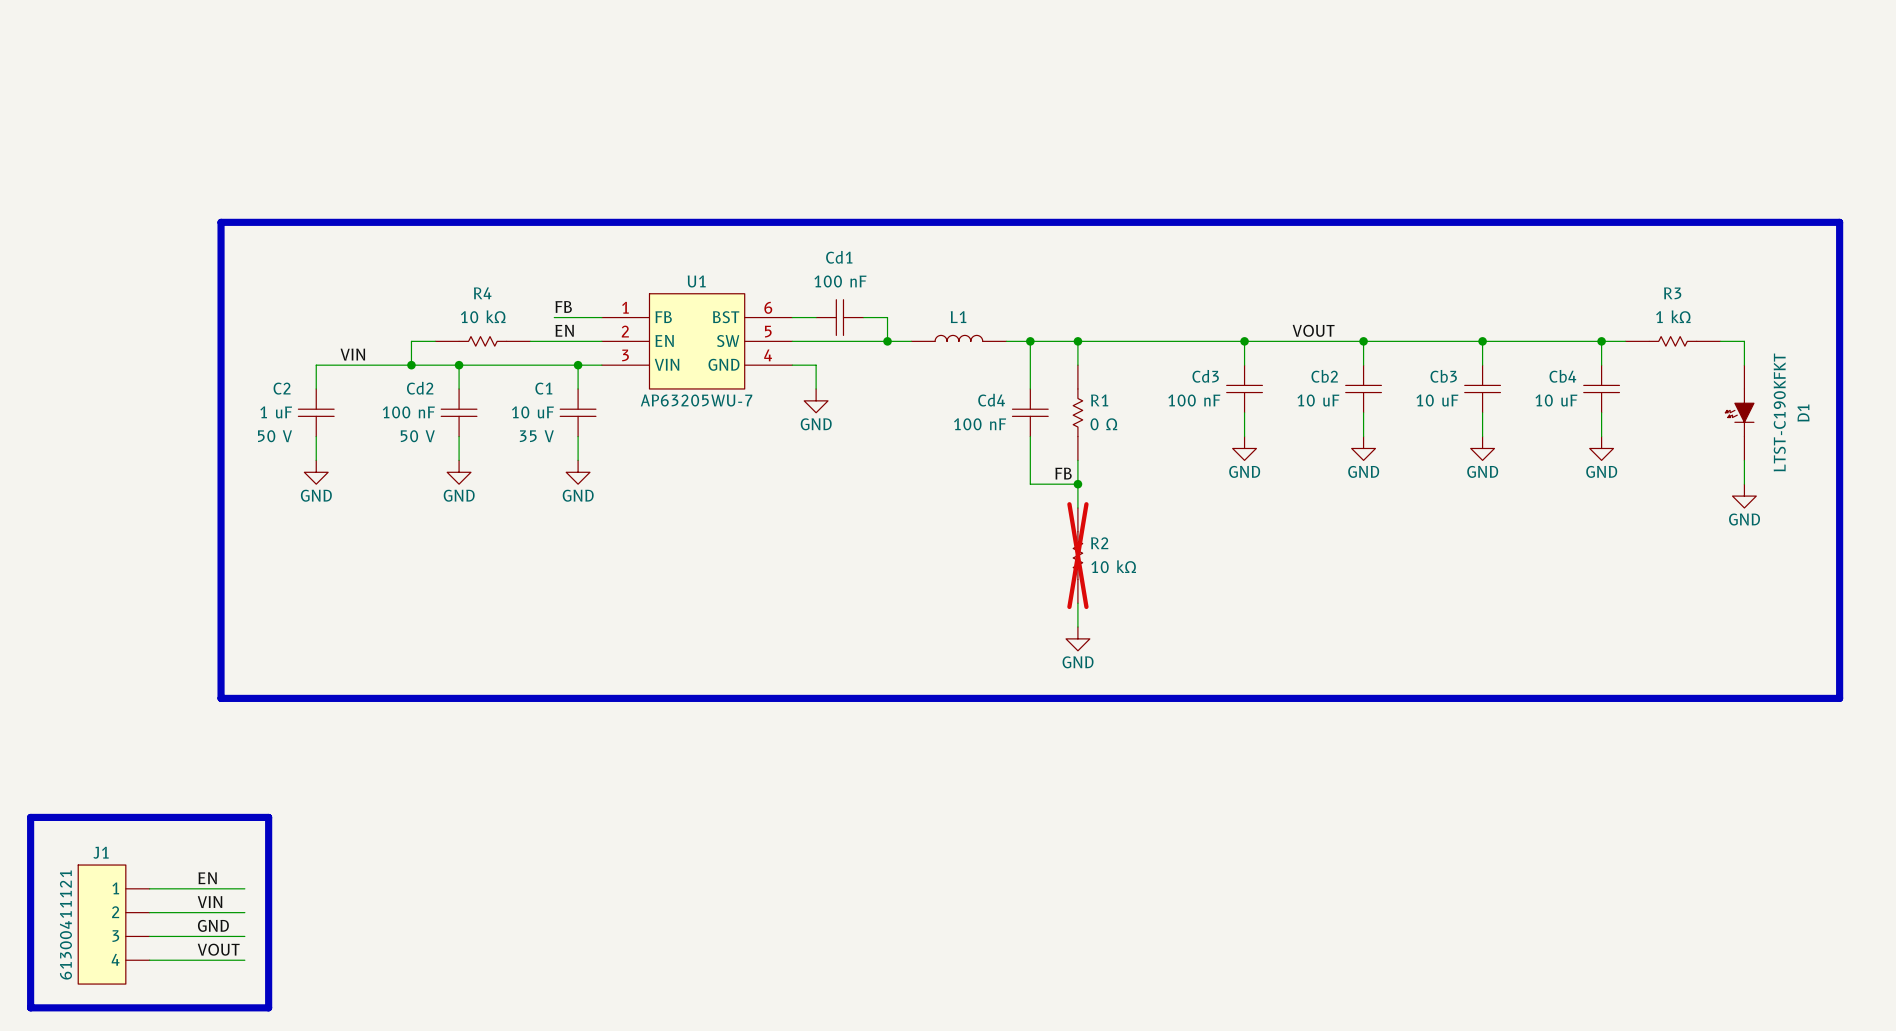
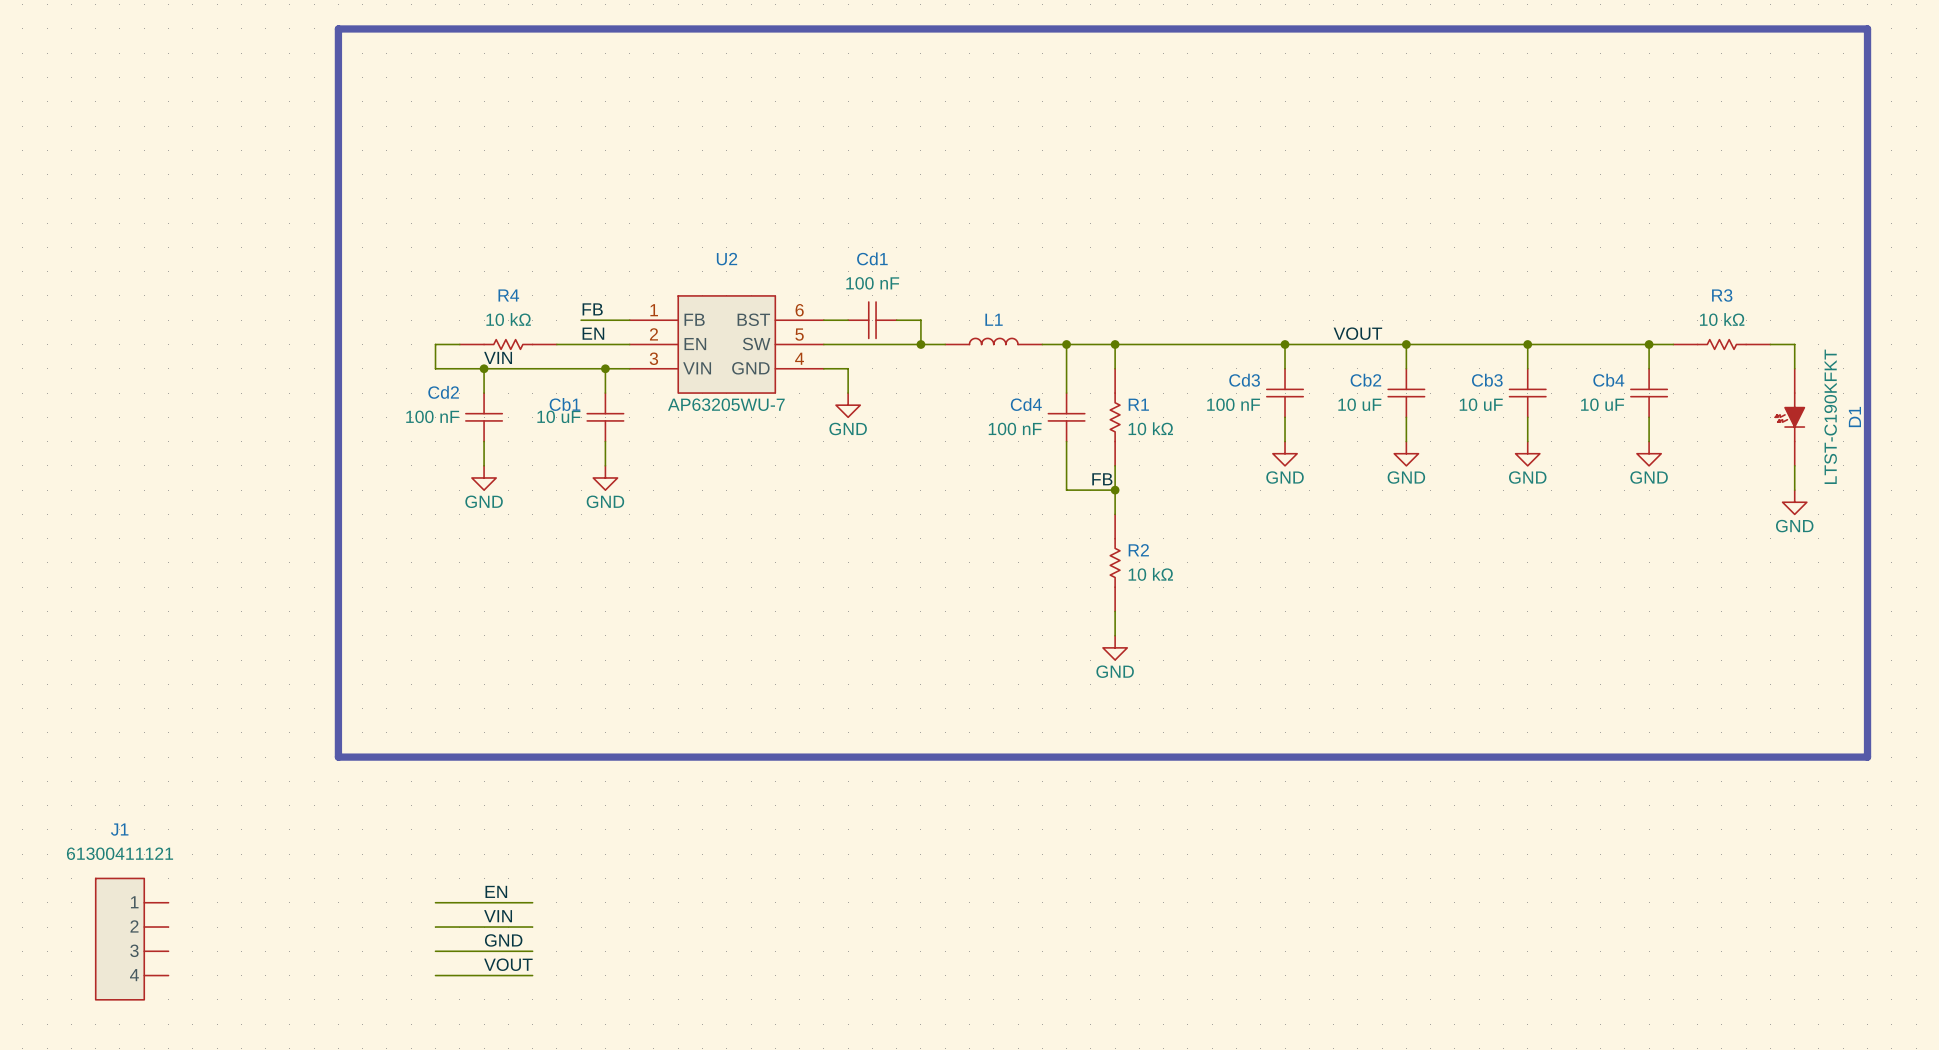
line: (221, 222) (1839, 222) (1839, 698) (221, 698) (221, 222) -> (338, 28) (338, 757) (1867, 757) (1867, 28) (338, 28)
U1 name: U1 (696, 281) -> U2 (727, 259)
R3 value: 1 kΩ (1673, 316) -> 10 kΩ (1722, 319)
label position: VIN (352, 354) -> VIN (498, 357)
wire: (411, 365) (316, 365) (316, 388) -> none
junction: (411, 365) -> none
C1 name: C1 (543, 388) -> Cb1 (564, 404)
C2: 1 uF (316, 412) -> none
R1 value: 0 Ω (1103, 424) -> 10 kΩ (1150, 428)
Cd2 text: 50 V (417, 436) -> none
C1 text: 35 V (536, 436) -> none
power symbol: GND (316, 472) -> none
R2 do-not-place cross: (1077, 555) -> none
line: (30, 817) (268, 817) (268, 1007) (30, 1007) (30, 817) -> none
J1 name position: J1 (101, 852) -> J1 (119, 829)
label: EN (207, 878) -> none
label: none -> EN (496, 891)
wire: (149, 888) (244, 888) -> none
wire: none -> (435, 902) (532, 902)
label: VIN (210, 902) -> none
label: none -> VIN (498, 916)
wire: (149, 912) (244, 912) -> none
wire: none -> (435, 927) (532, 927)
J1 value rotation: 0° (65, 925) -> 90° clockwise (120, 853)
label: GND (213, 925) -> none
label: none -> GND (503, 940)
wire: (149, 936) (244, 936) -> none
wire: none -> (435, 951) (532, 951)
label: VOUT (218, 949) -> none
label: none -> VOUT (508, 964)
wire: (149, 960) (244, 960) -> none
wire: none -> (435, 975) (532, 975)

